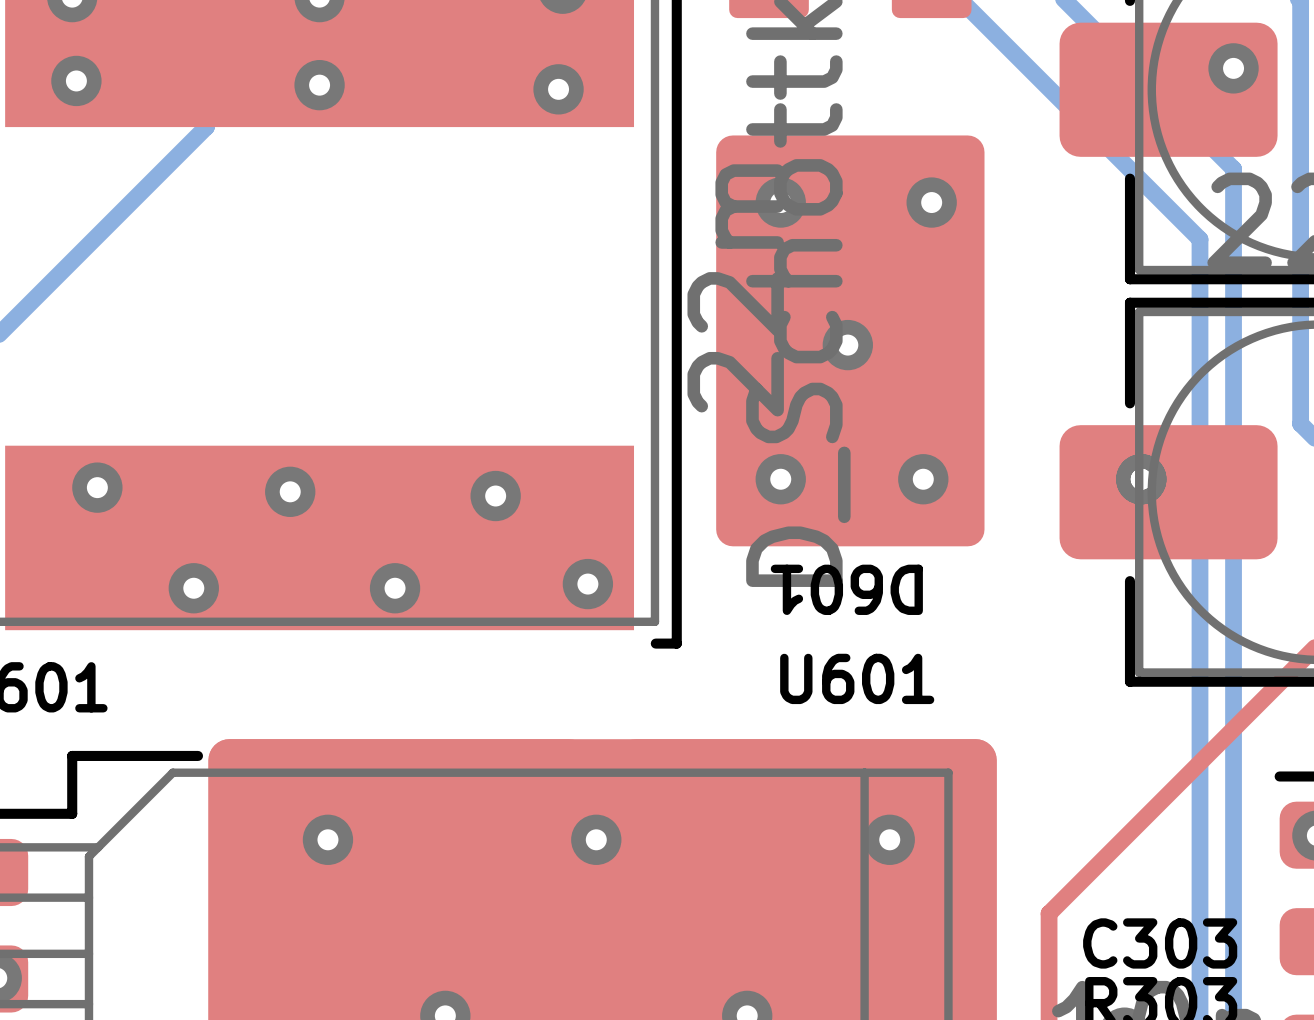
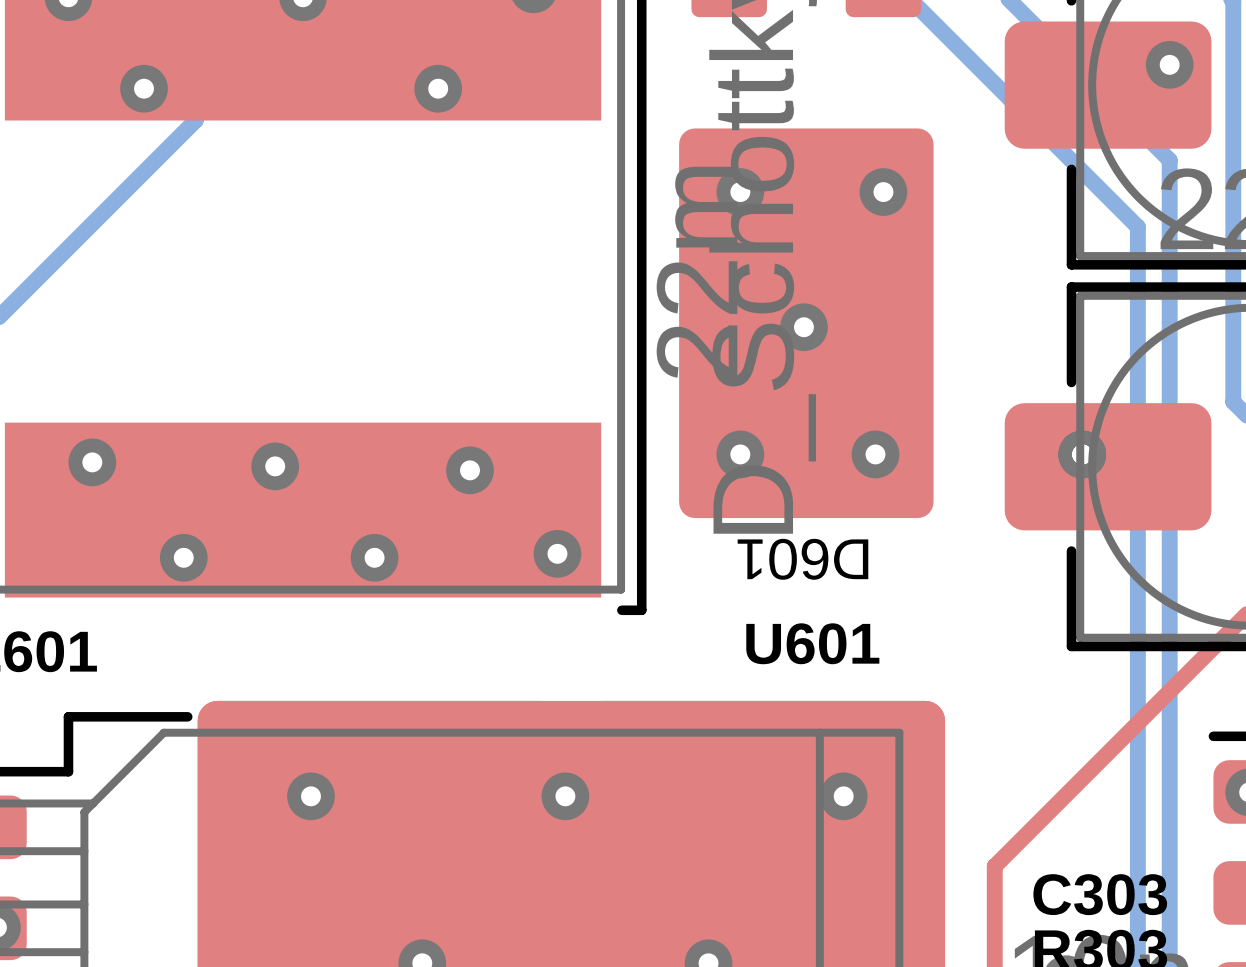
via position: (76, 80) -> (144, 88)
via: (319, 85) -> none
via: (558, 89) -> none
via: none -> (438, 88)

